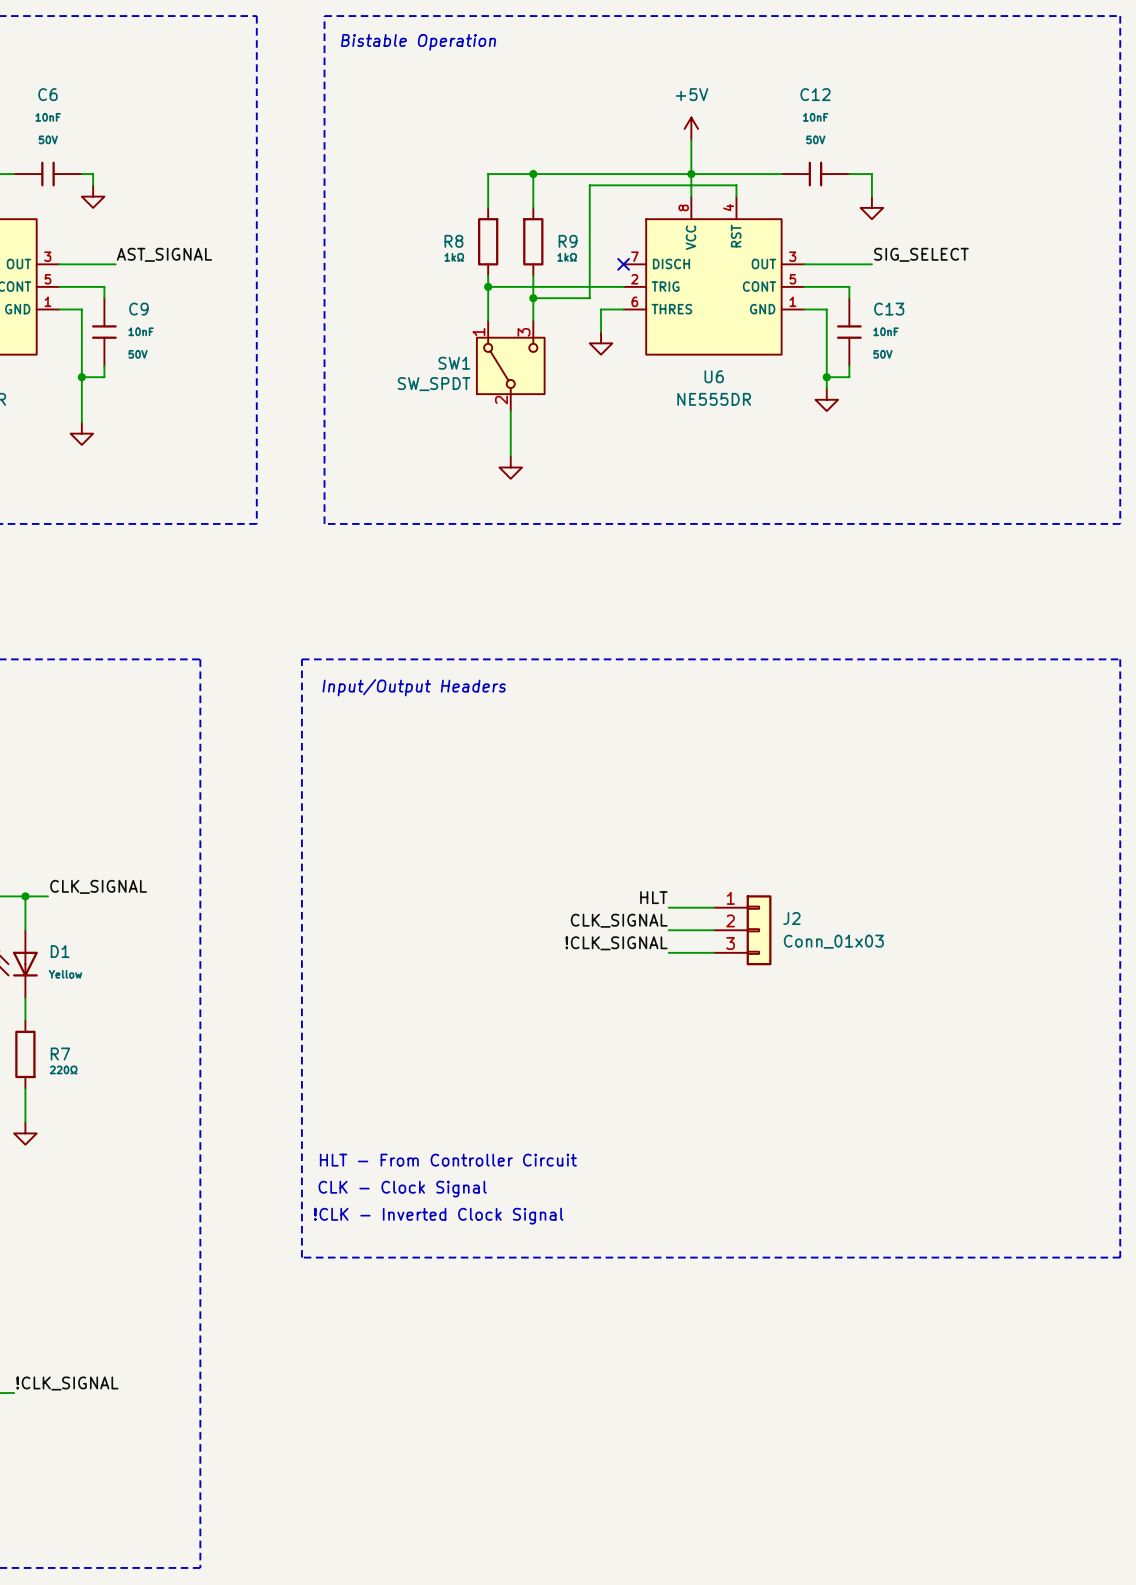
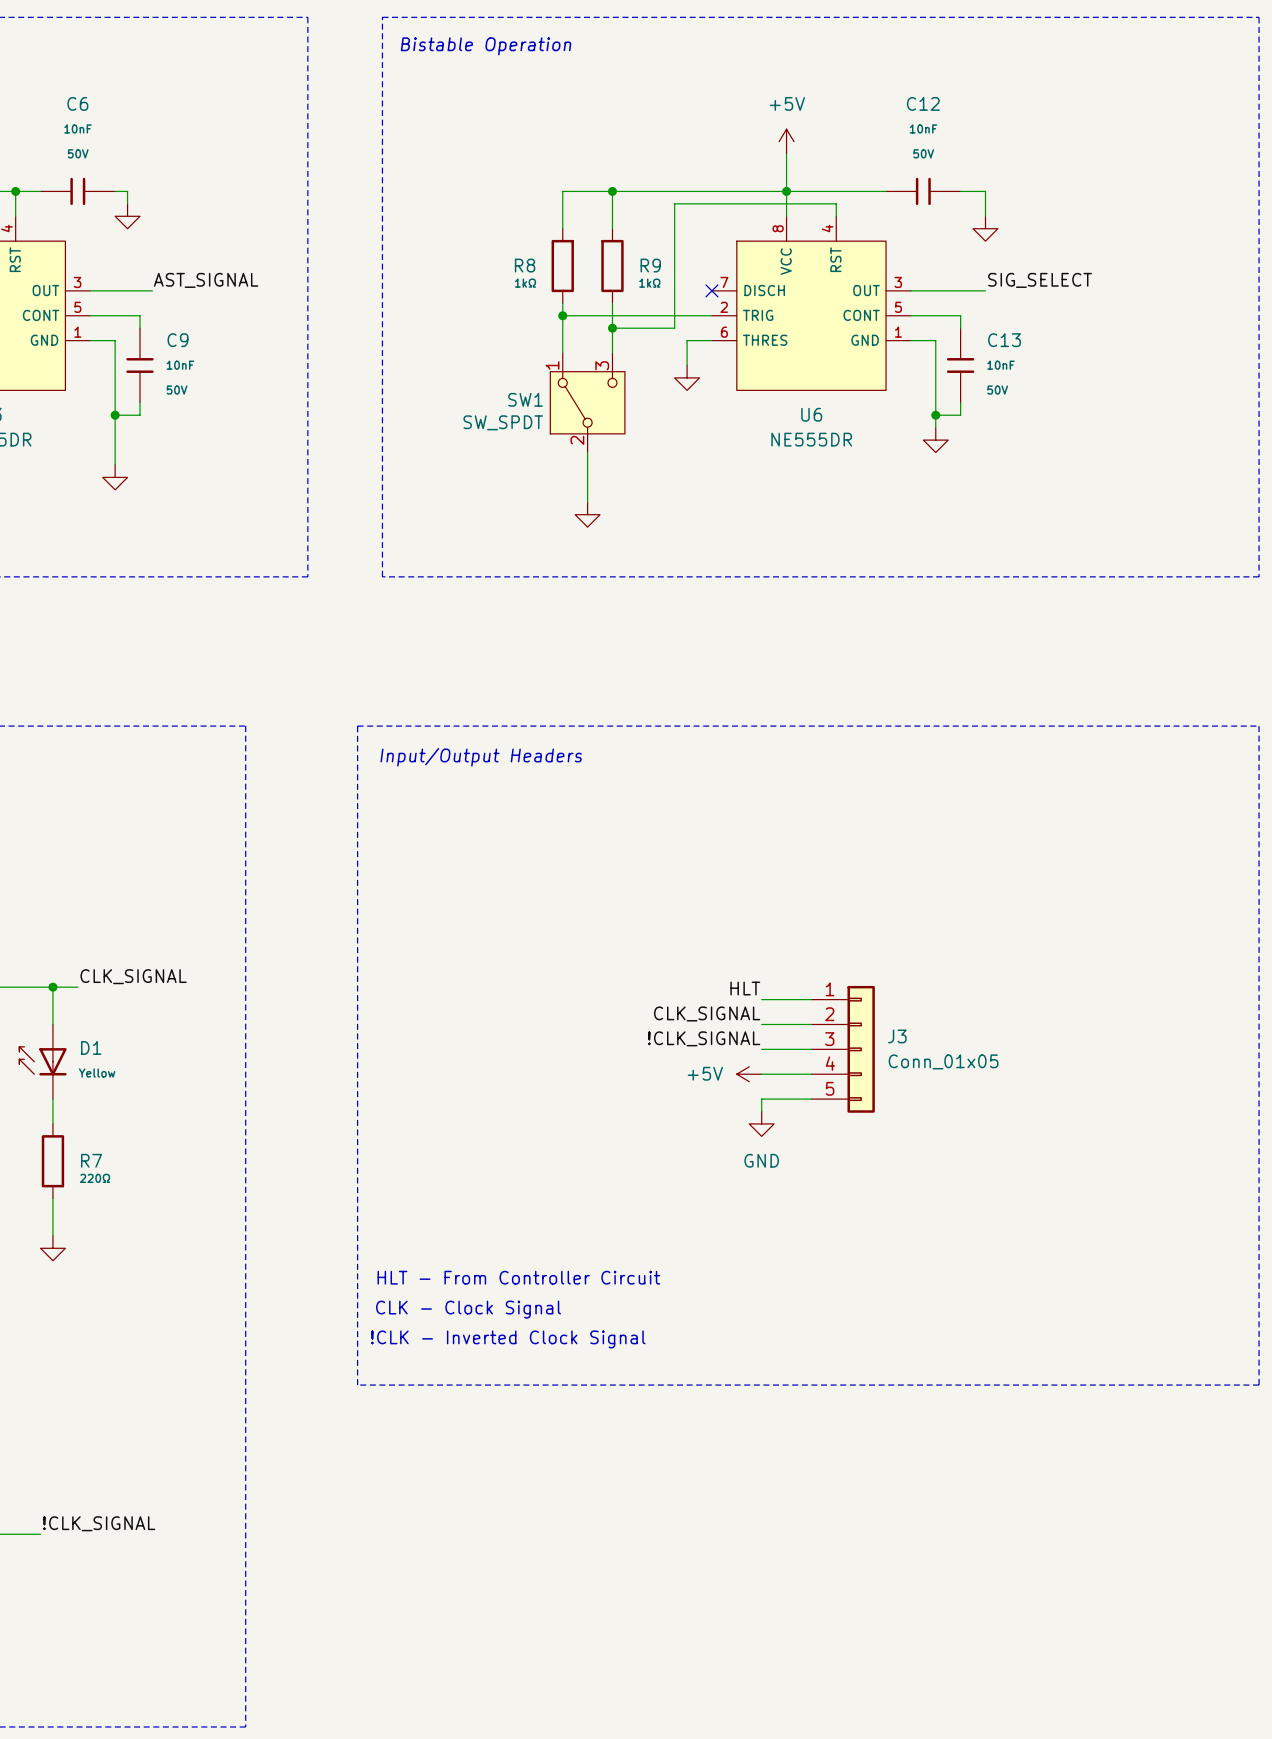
J2: Conn_01x03 (742, 930) -> none
J3: none -> Conn_01x05 (843, 1049)
power symbol: none -> +5V (749, 1074)
wire: none -> (761, 1074) (811, 1074)
wire: none -> (811, 1099) (761, 1099) (761, 1111)
power symbol: none -> GND (761, 1123)

